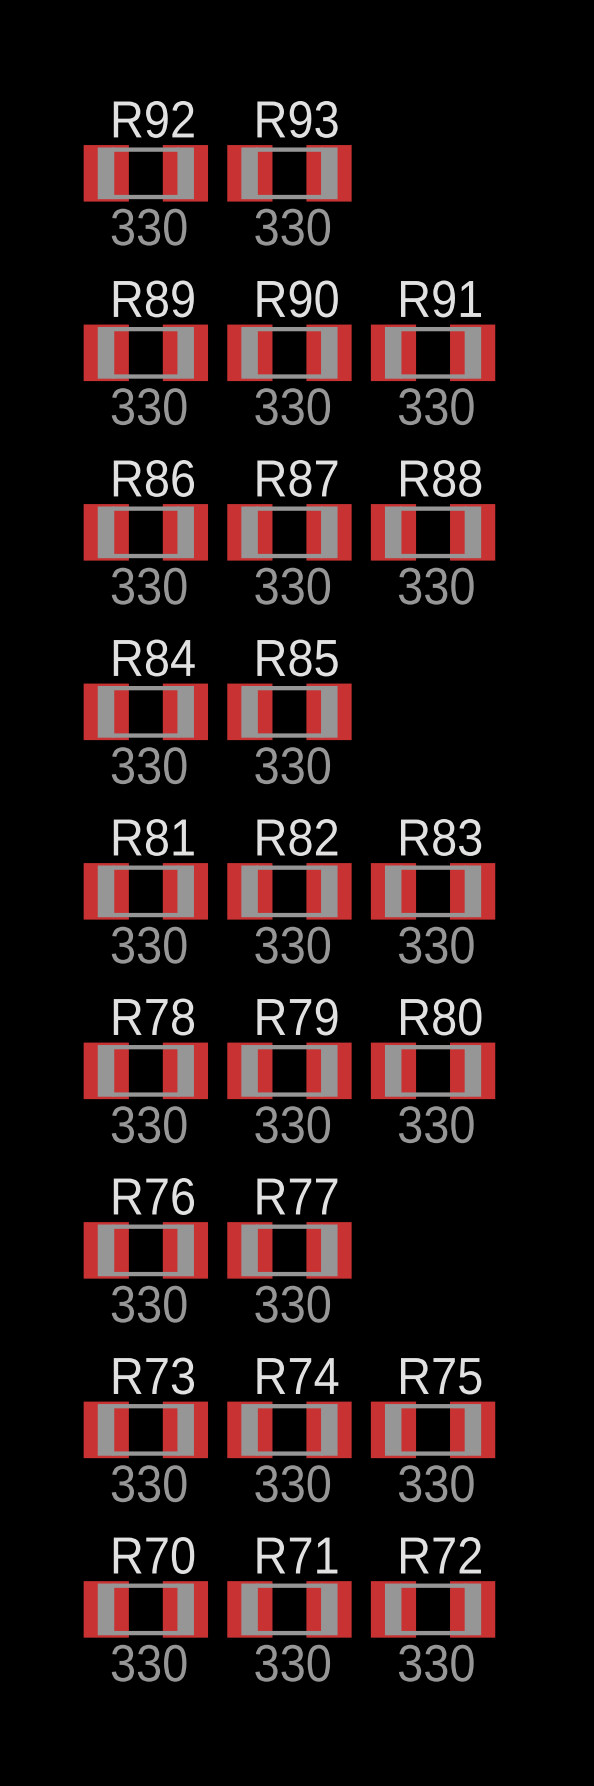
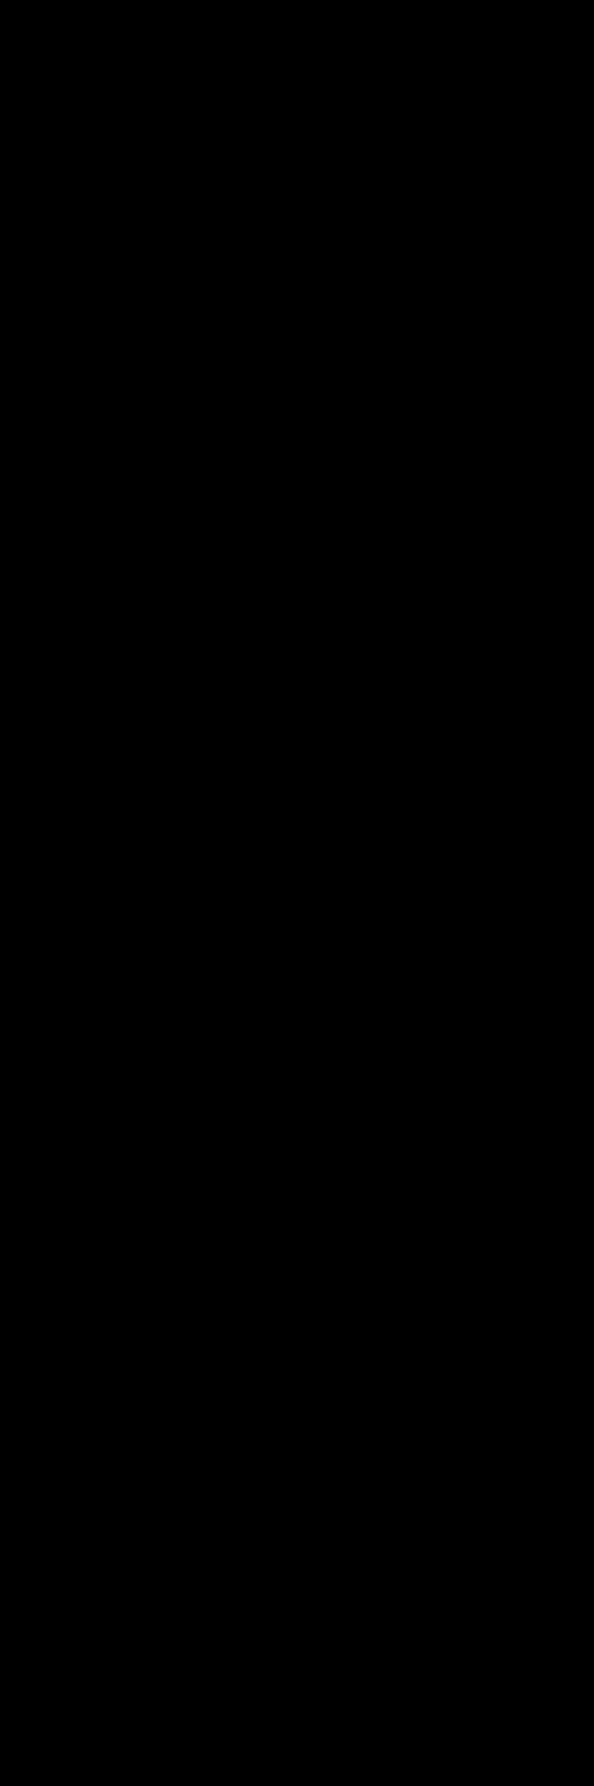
R92: 330 (145, 173) -> none
R93: 330 (289, 173) -> none
R89: 330 (145, 352) -> none
R90: 330 (289, 352) -> none
R91: 330 (433, 352) -> none
R86: 330 (145, 532) -> none
R87: 330 (289, 532) -> none
R88: 330 (433, 532) -> none
R84: 330 (145, 711) -> none
R85: 330 (289, 711) -> none
R81: 330 (145, 891) -> none
R82: 330 (289, 891) -> none
R83: 330 (433, 891) -> none
R78: 330 (145, 1070) -> none
R79: 330 (289, 1070) -> none
R80: 330 (433, 1070) -> none
R76: 330 (145, 1250) -> none
R77: 330 (289, 1250) -> none
R73: 330 (145, 1429) -> none
R74: 330 (289, 1429) -> none
R75: 330 (433, 1429) -> none
R70: 330 (145, 1609) -> none
R71: 330 (289, 1609) -> none
R72: 330 (433, 1609) -> none

